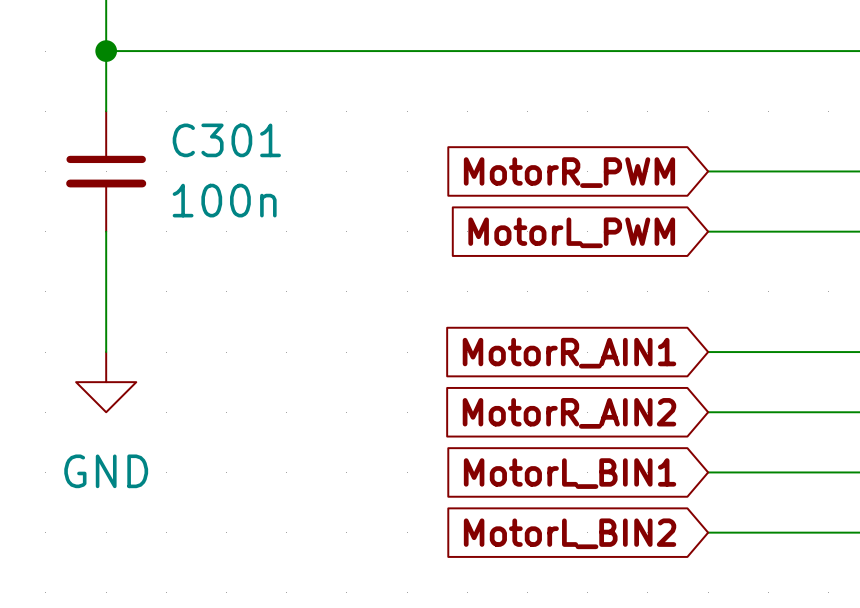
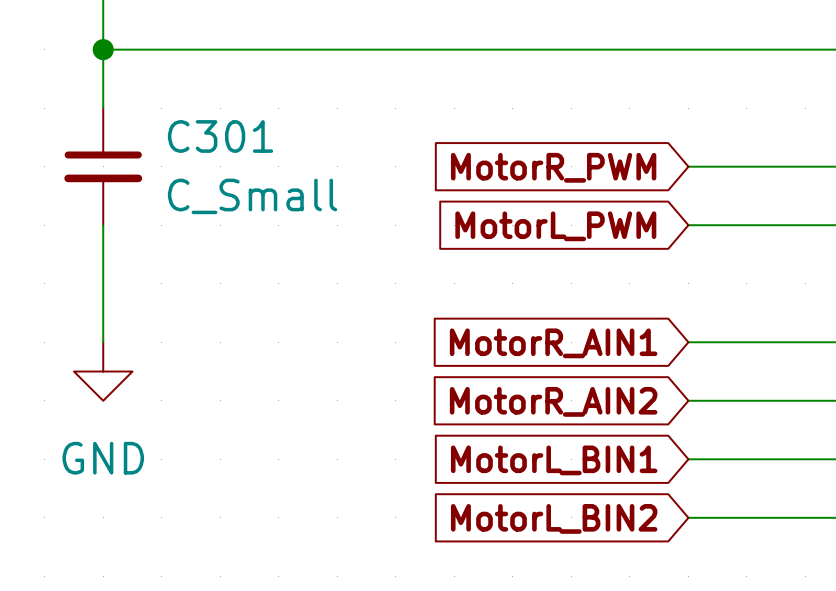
C301 value: 100n (224, 200) -> C_Small (252, 196)

